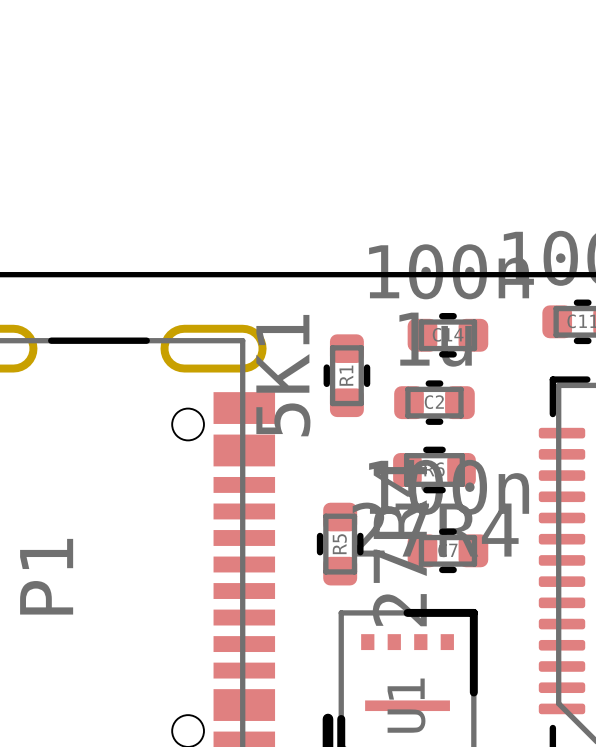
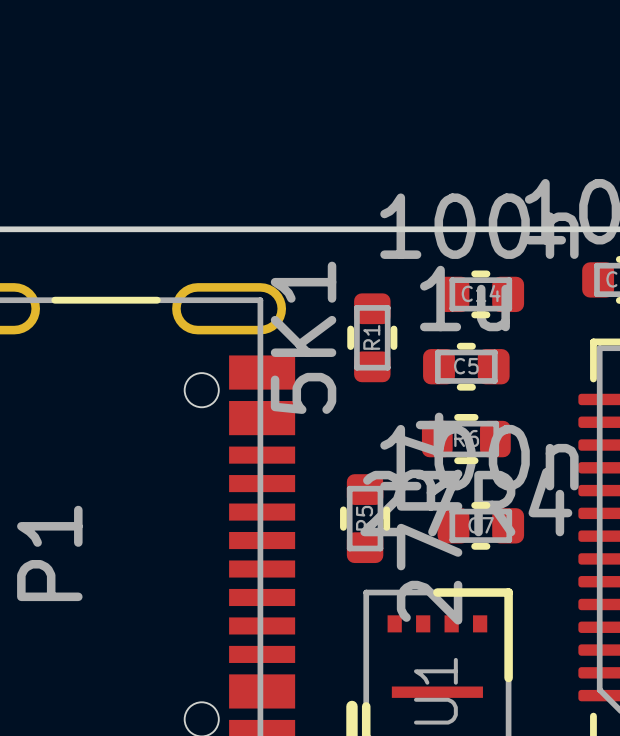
C2 name: C2 (434, 402) -> C5 (466, 366)

